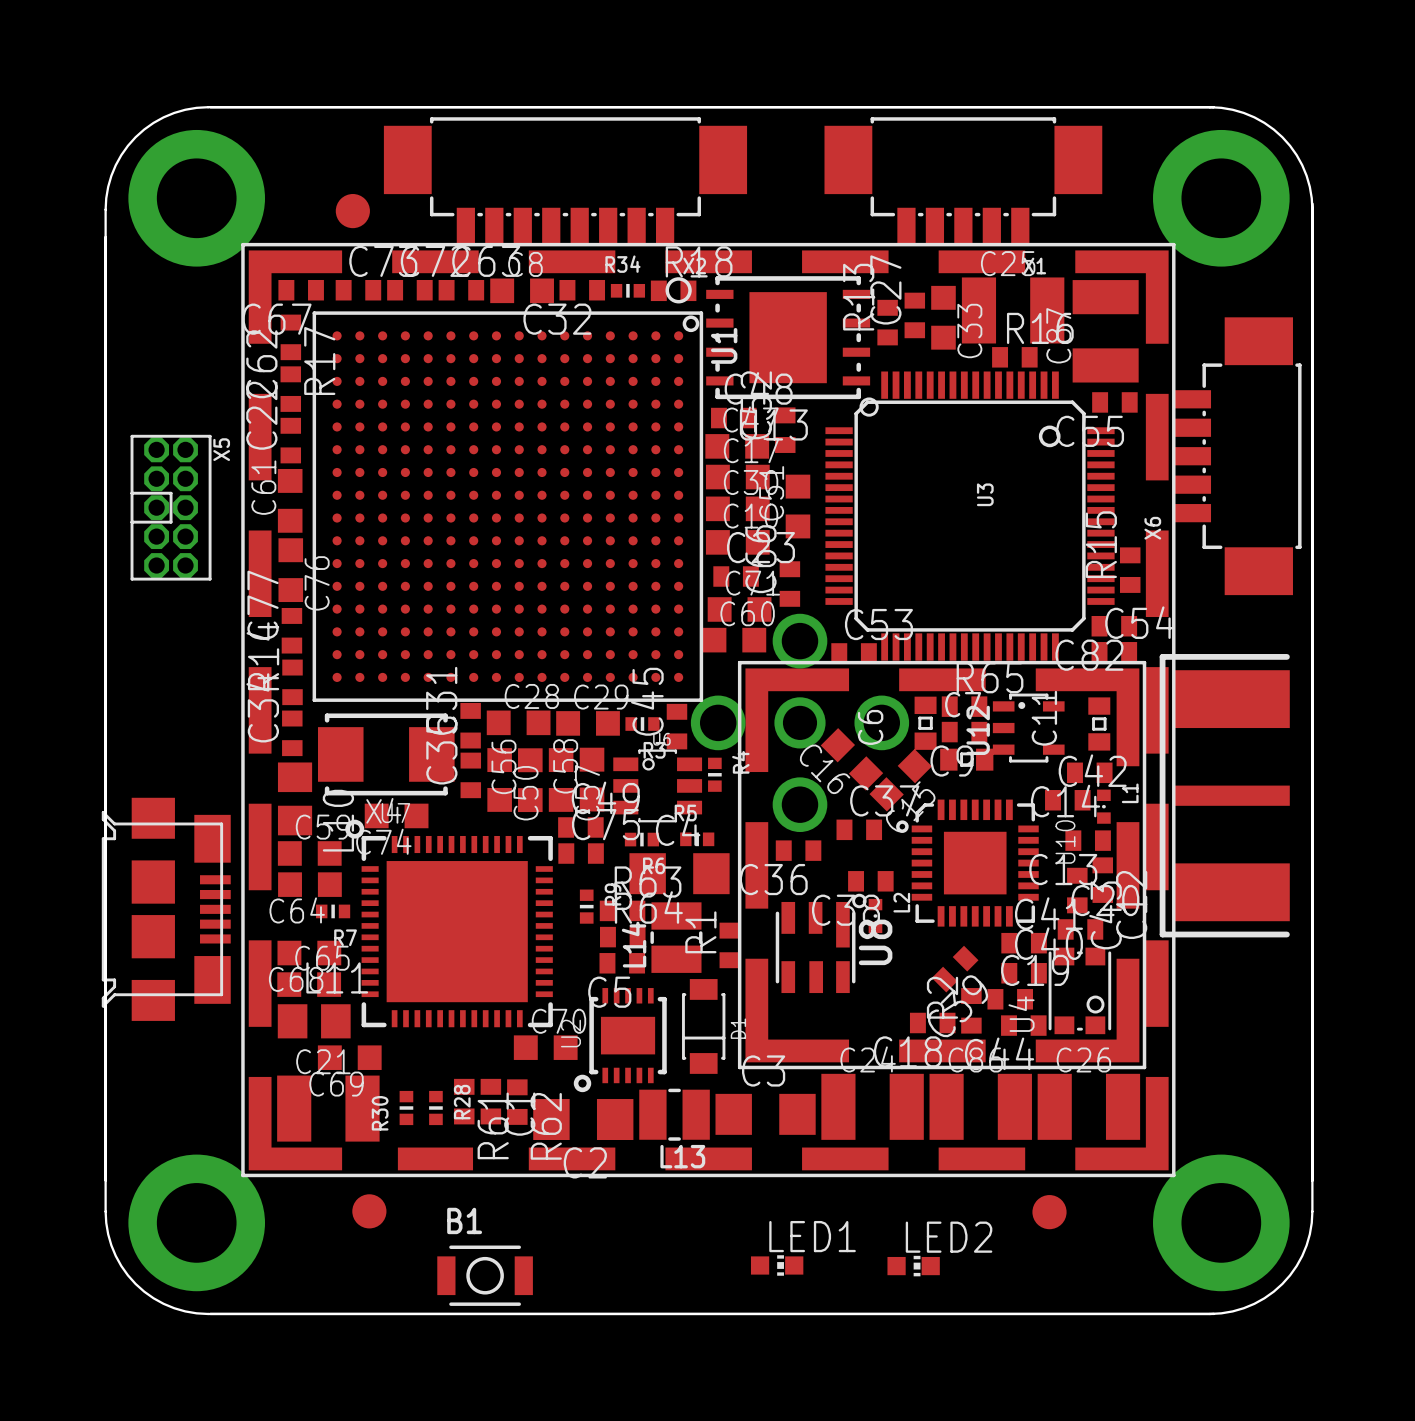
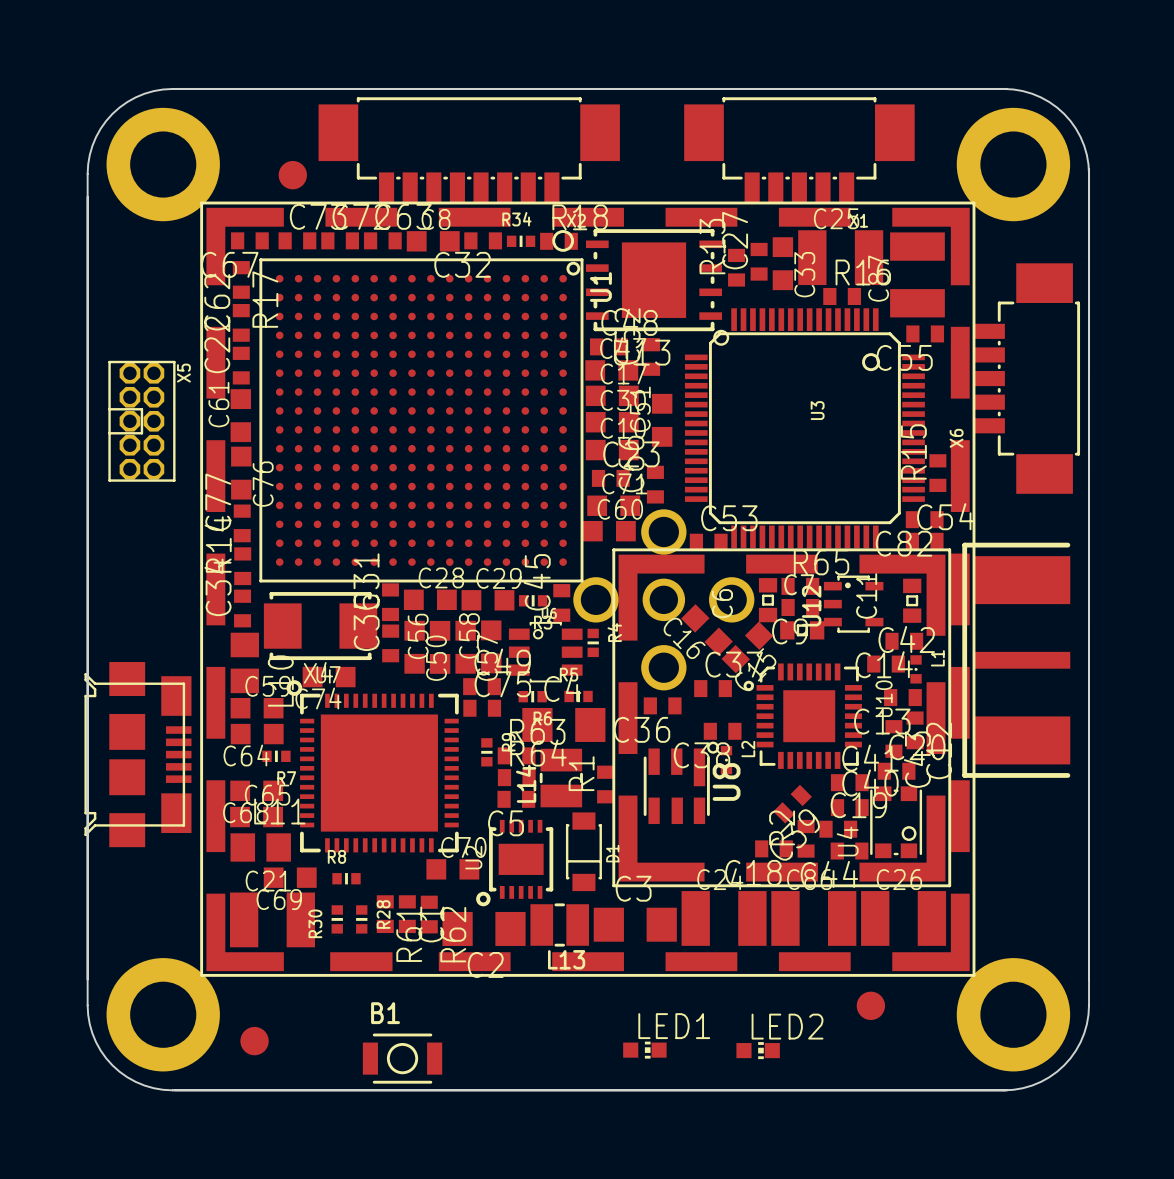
R8: none -> (346, 878)
part position: (369, 1211) -> (254, 1041)

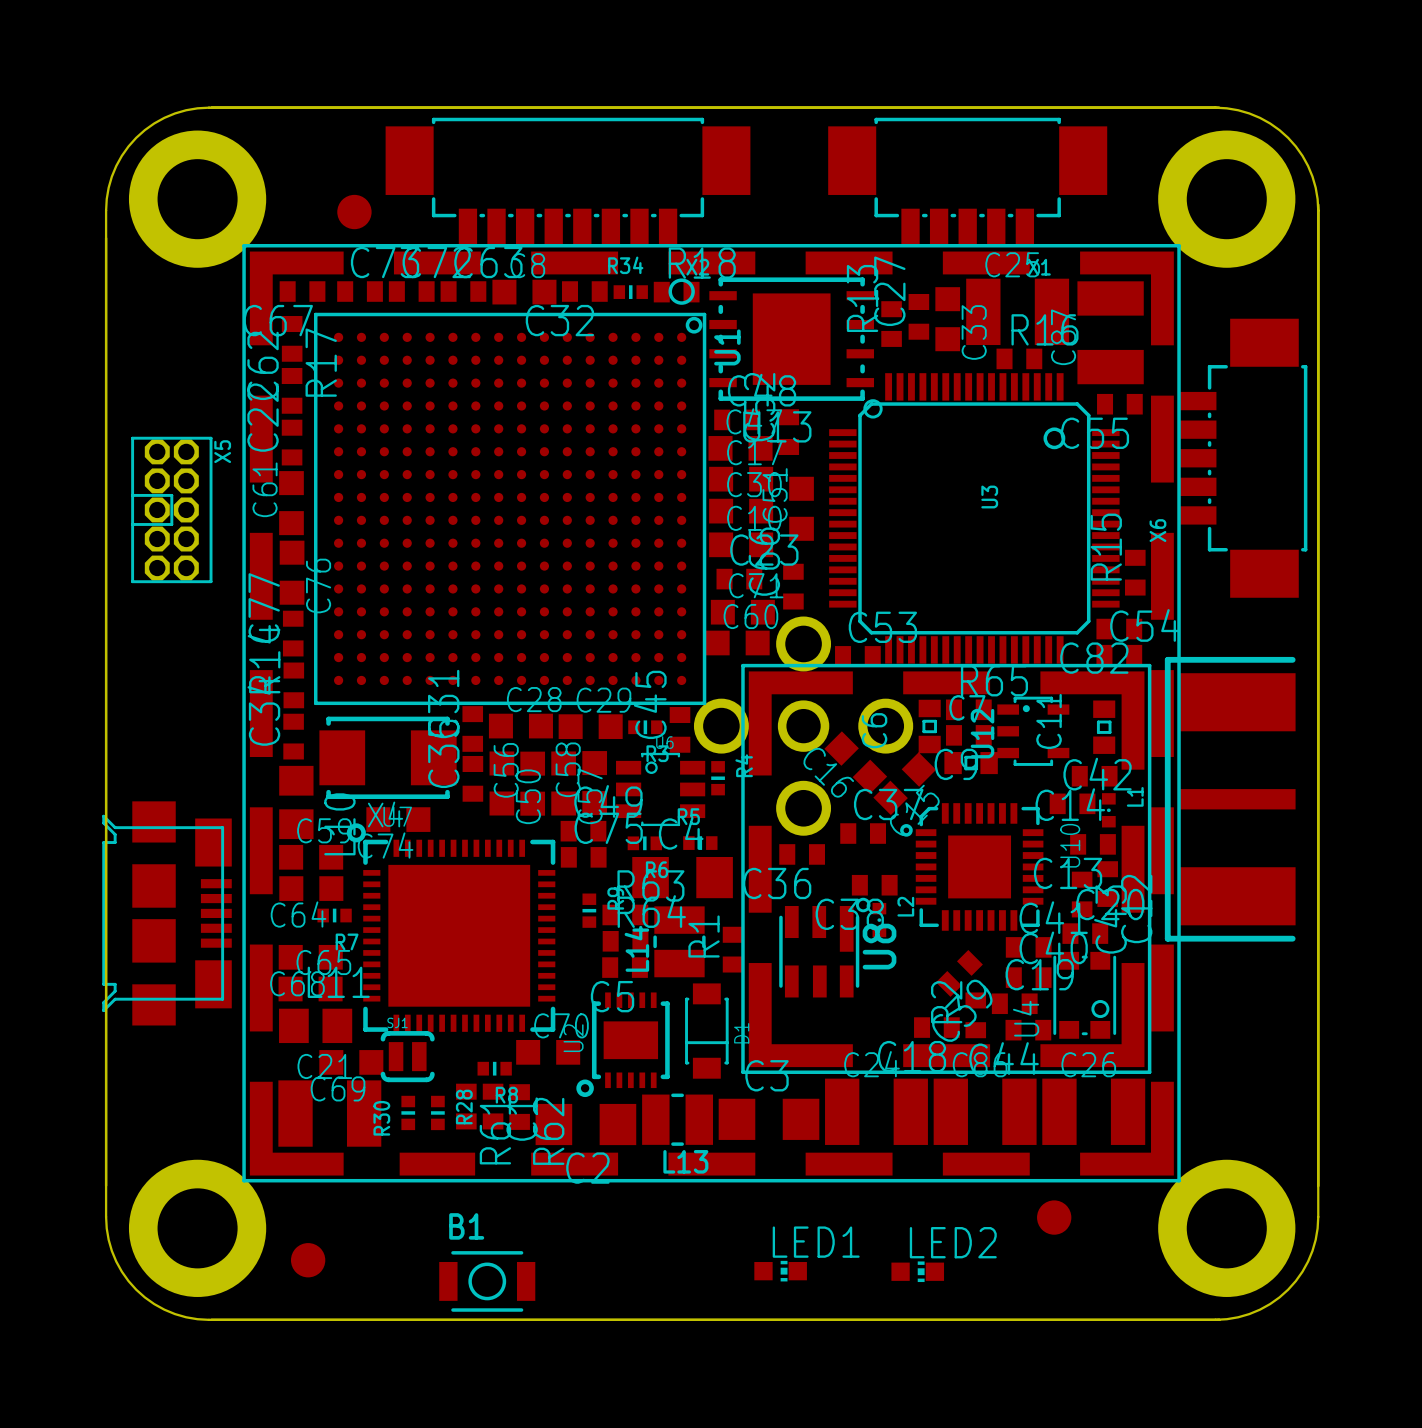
R8 name position: R8 (336, 856) -> R8 (506, 1095)
SJ1: none -> (407, 1056)
R8 position: (346, 878) -> (494, 1068)

